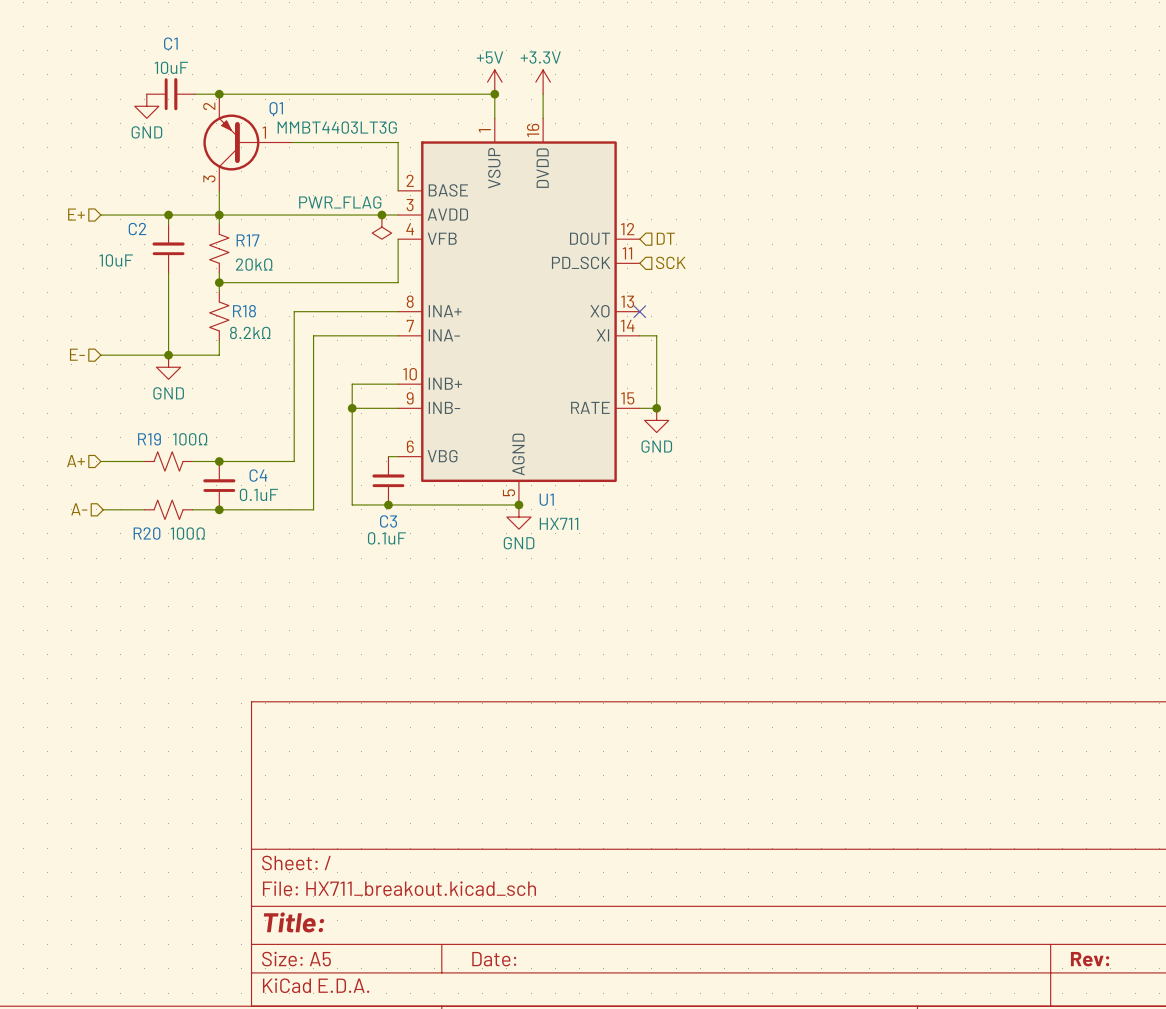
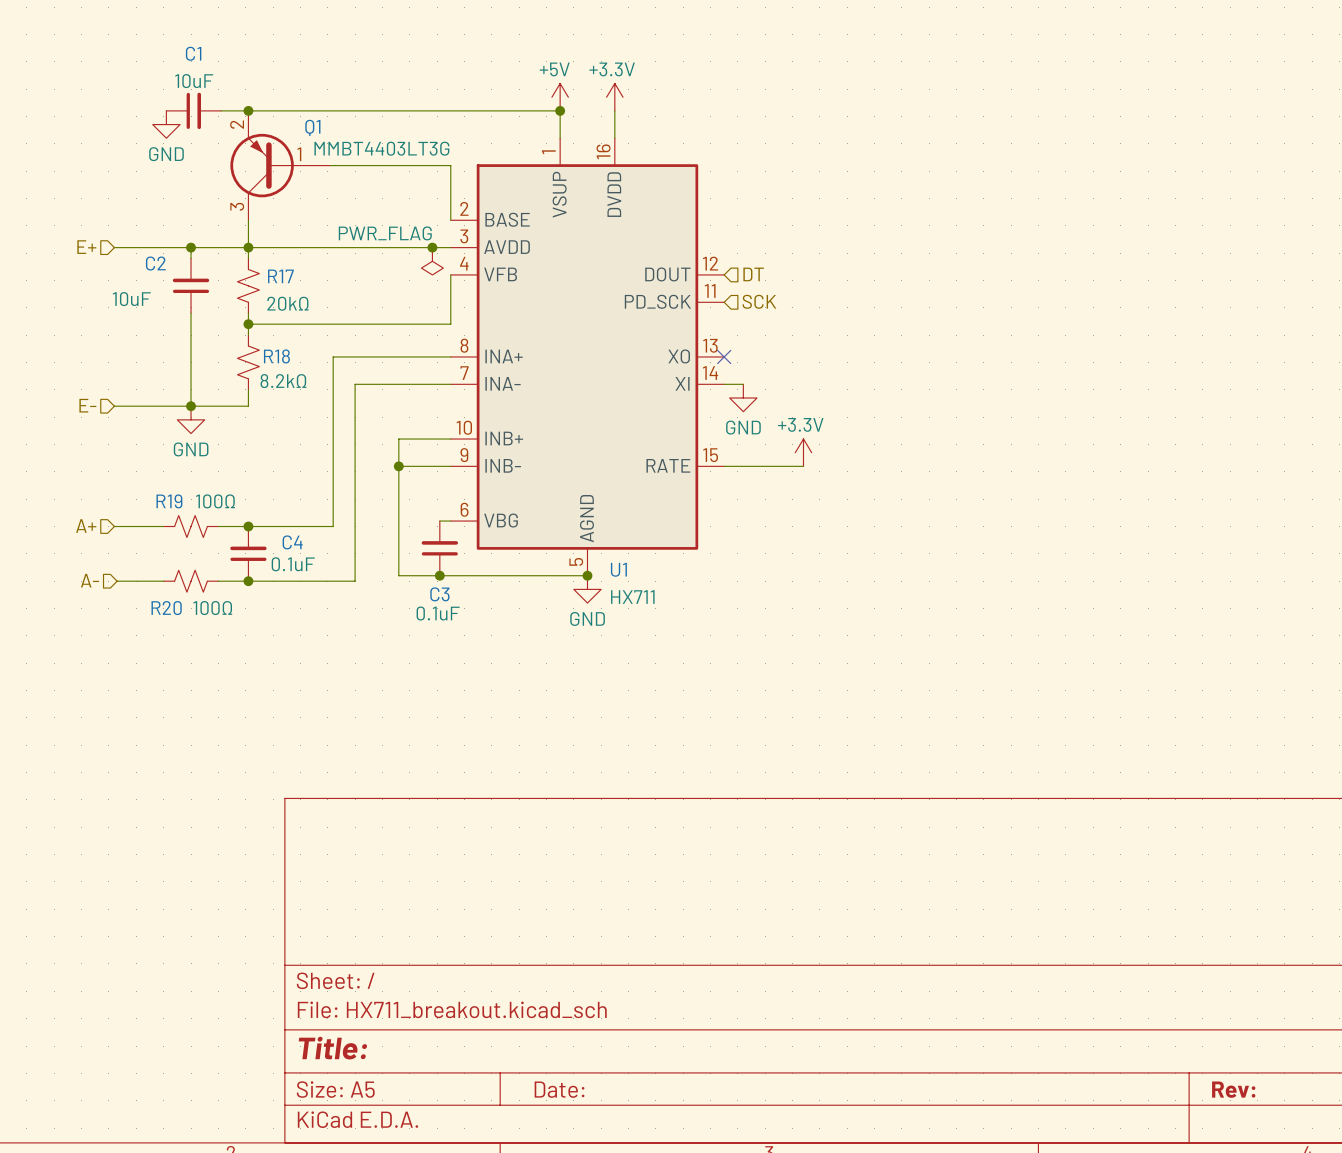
wire: (656, 335) (656, 408) -> (803, 466) (743, 466)
power symbol: none -> +3.3V (803, 452)
junction: (656, 408) -> none
power symbol position: GND (656, 420) -> GND (743, 398)

